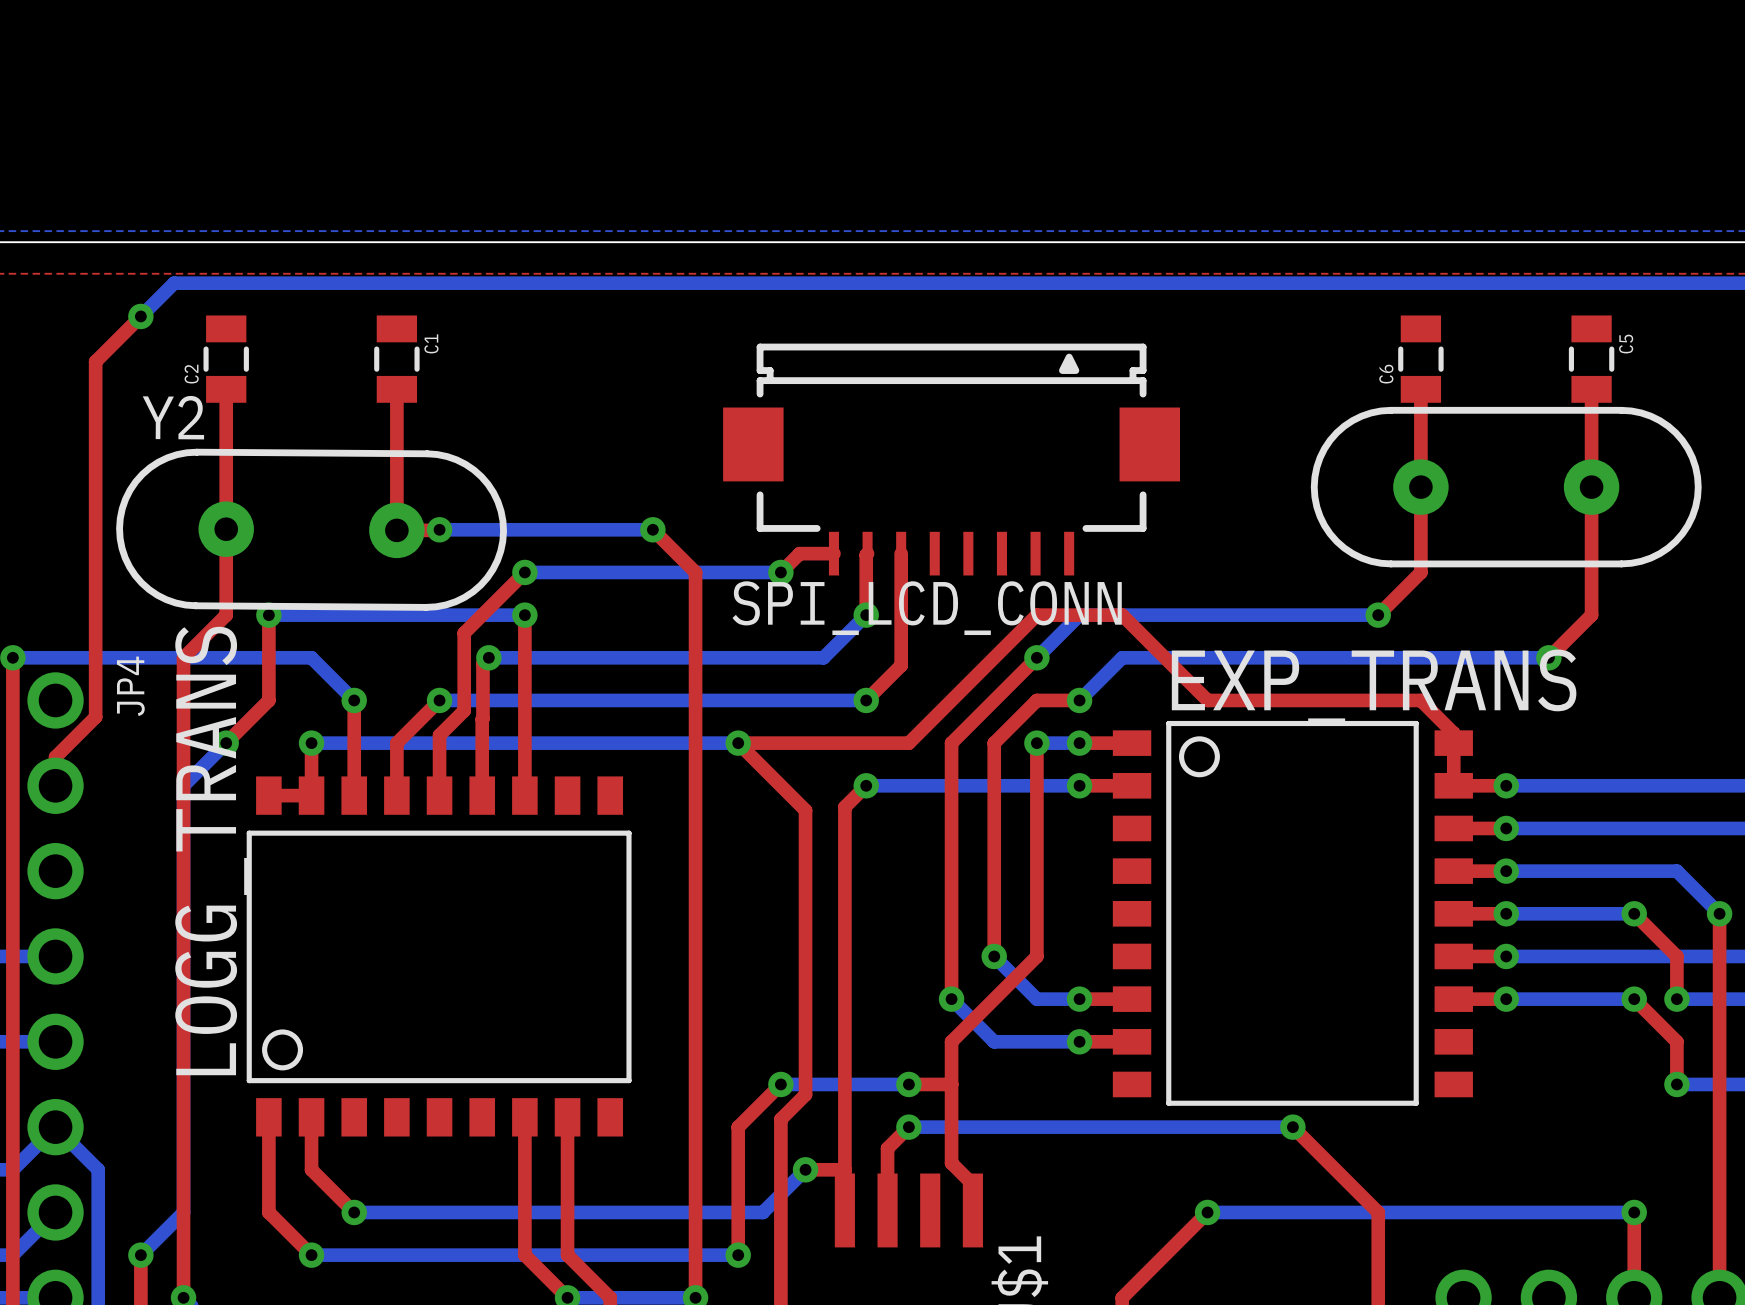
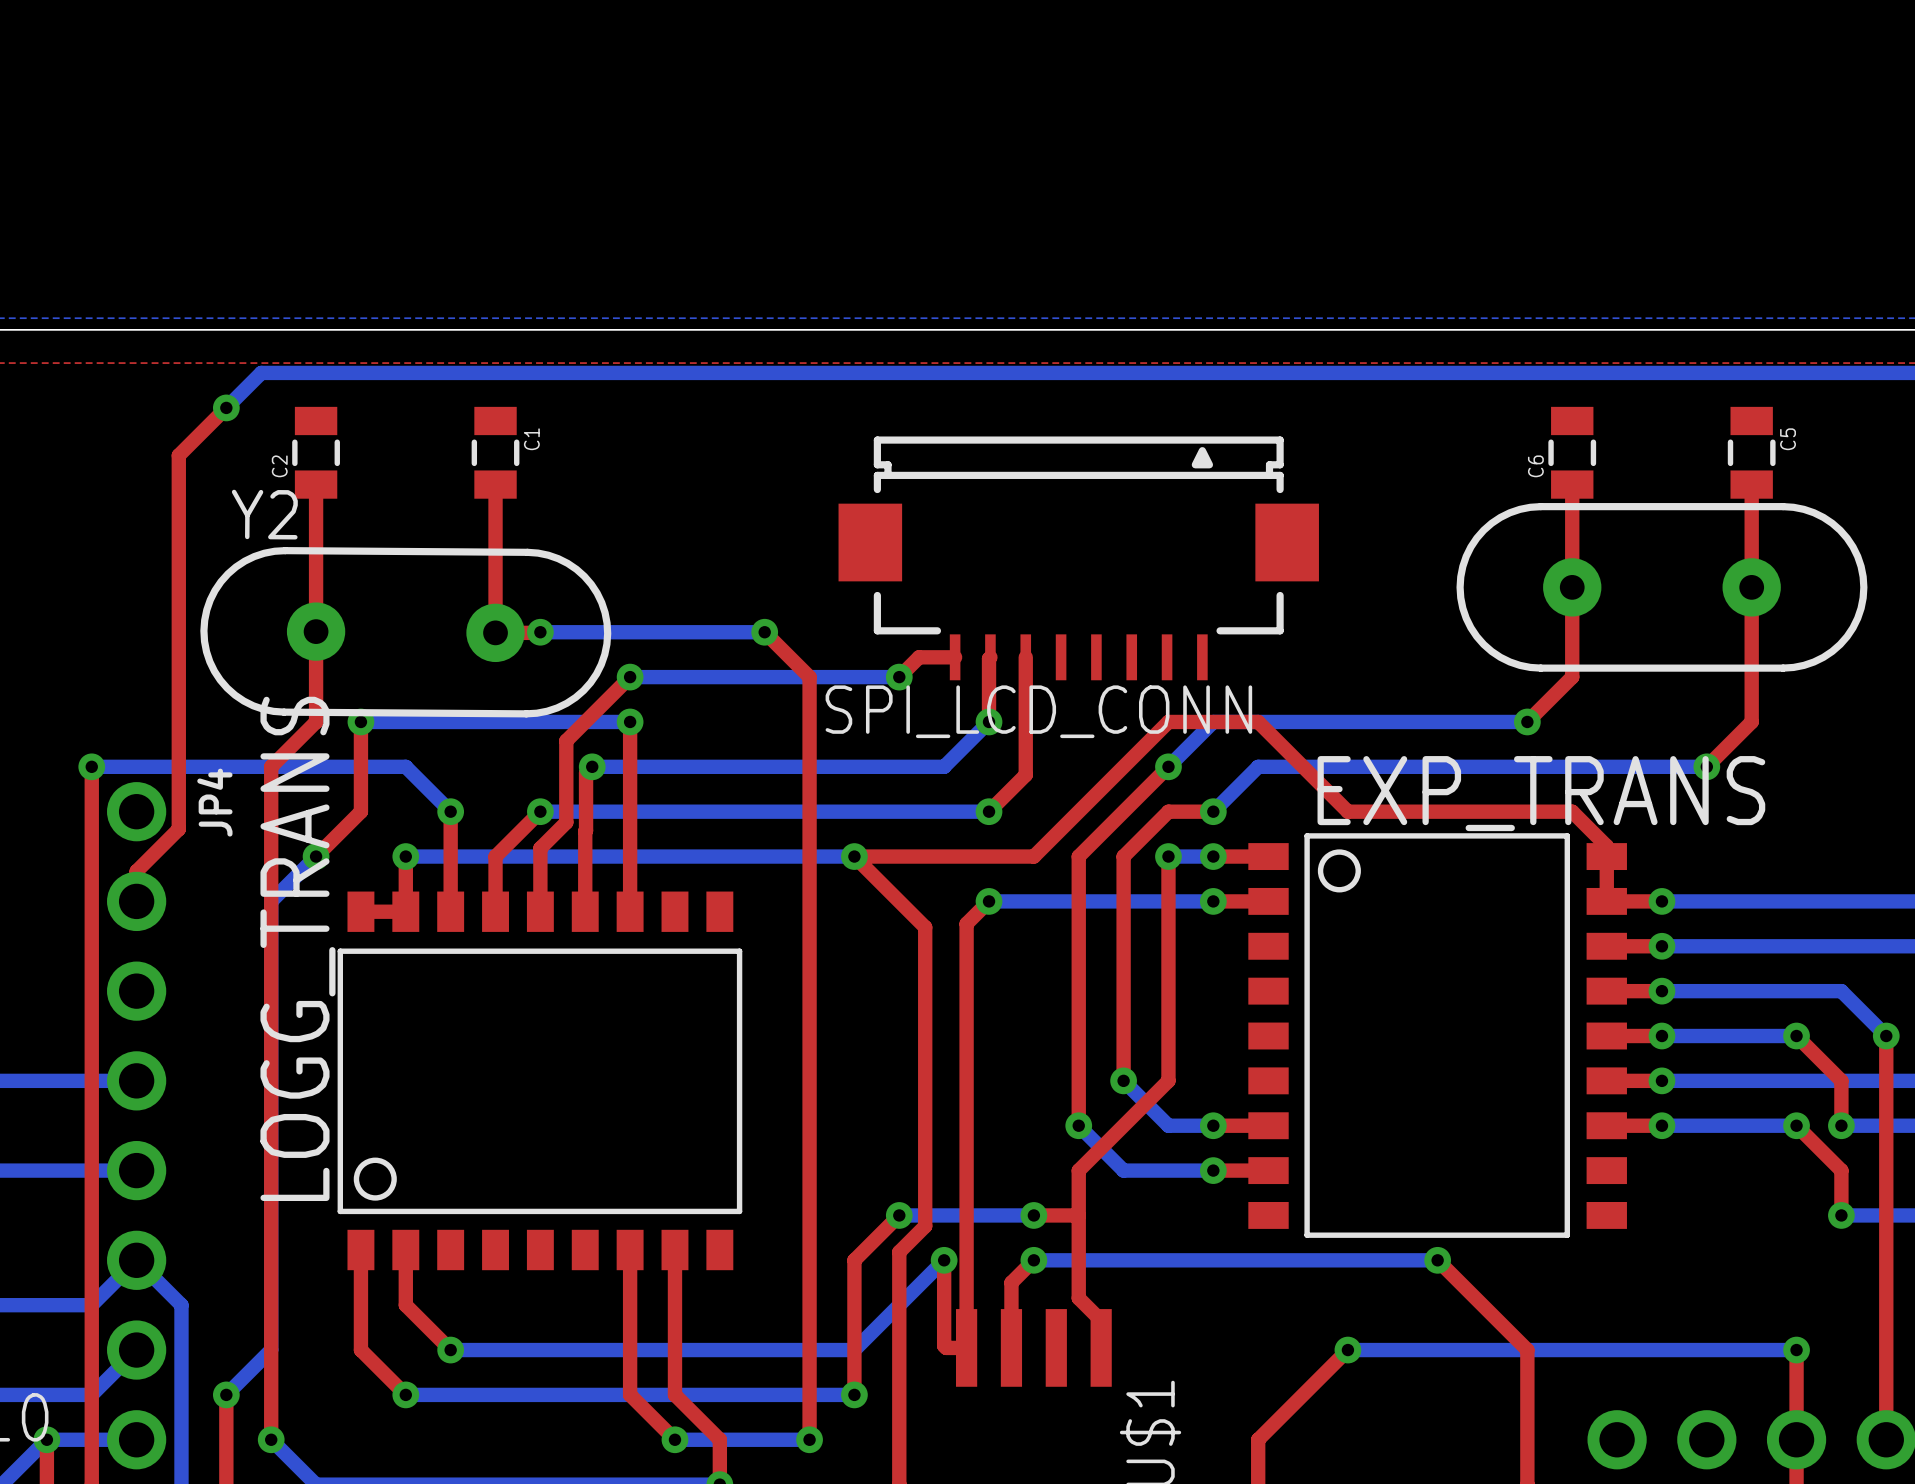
top track: none -> (944, 1260) (944, 1345) (946, 1347) (966, 1347) (964, 1350)
top track: (805, 1169) (844, 1169) -> none
bottom track: (805, 1169) (762, 1212) (738, 1212) -> (944, 1260) (854, 1350)
via position: (805, 1169) -> (944, 1260)

